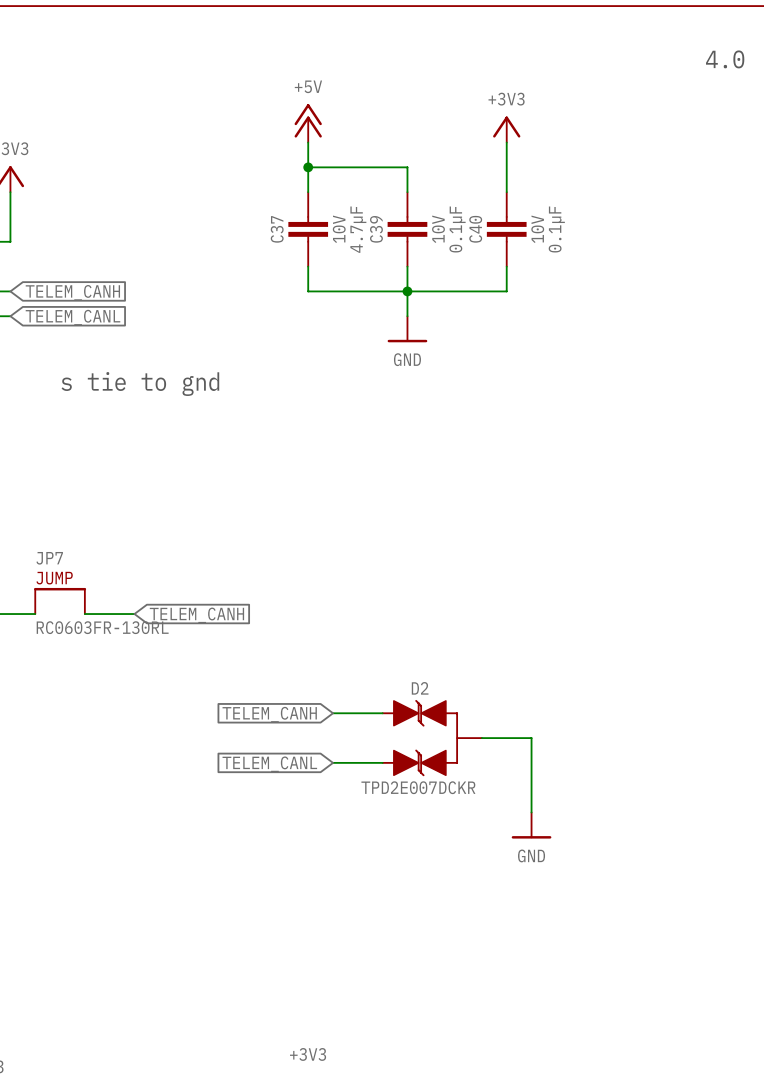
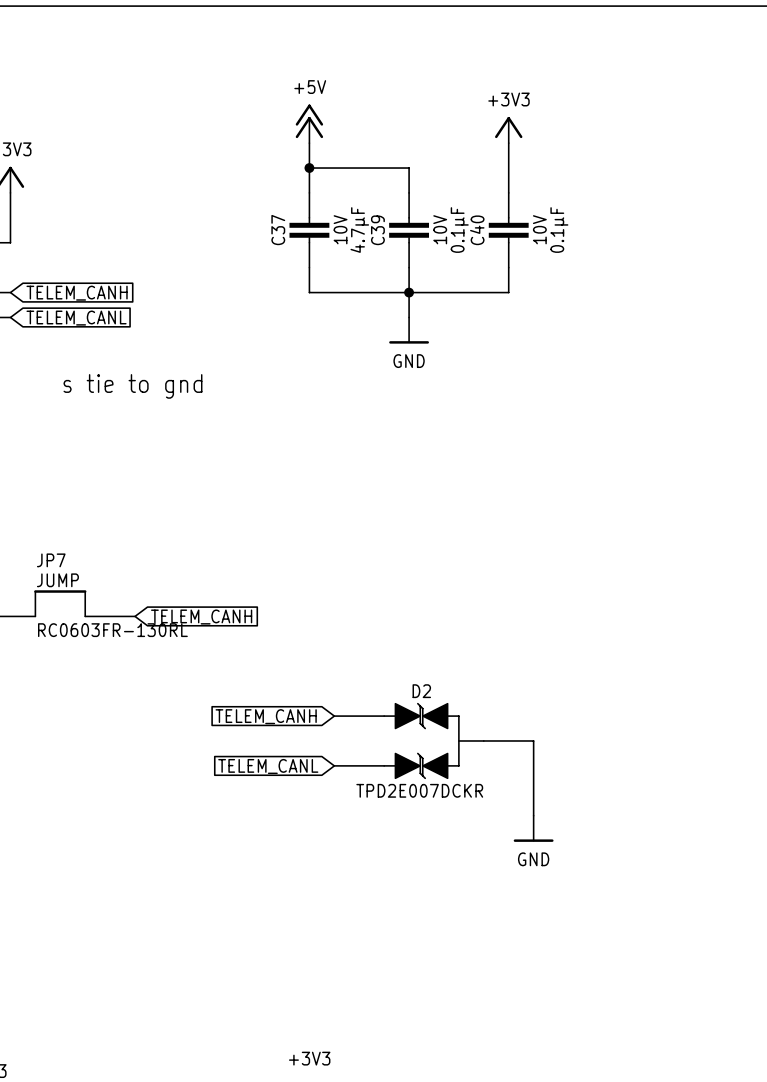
text: 4.0 (725, 59) -> none

